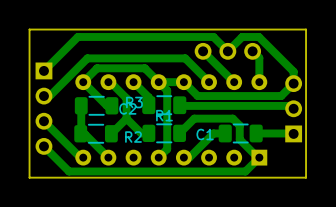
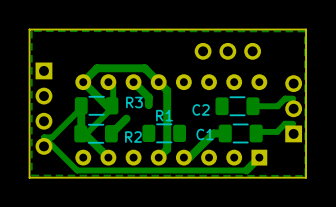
zone outline: none -> (31, 31) (305, 31) (305, 175) (31, 175) (31, 31)
track: (203, 51) (234, 82) -> none
track: (252, 51) (259, 57) (259, 82) -> none
track: (43, 70) (77, 36) (213, 36) (227, 51) (242, 36) (258, 36) (293, 71) (293, 83) (281, 96) (197, 96) (183, 82) (158, 82) -> none
track: (108, 82) (126, 98) (126, 118) (141, 133) (148, 133) -> (108, 82) (113, 86) (113, 106) (87, 132) (82, 132)
track: (209, 82) (185, 58) (87, 58) (49, 96) (43, 96) -> none
track: none -> (293, 98) (285, 98) (277, 106) (252, 106)
C2 position: (164, 105) -> (237, 106)
track: (179, 105) (290, 105) (293, 108) -> none
track: (43, 121) (80, 157) (83, 157) -> none
track: none -> (293, 123) (285, 123) (277, 131) (253, 131)
track: (179, 133) (194, 118) (232, 118) (239, 125) (239, 139) (259, 157) -> none
track: (256, 133) (293, 133) -> none
track: (43, 146) (69, 171) (246, 170) -> (82, 106) (52, 137) (44, 137) (77, 170) (246, 170)

